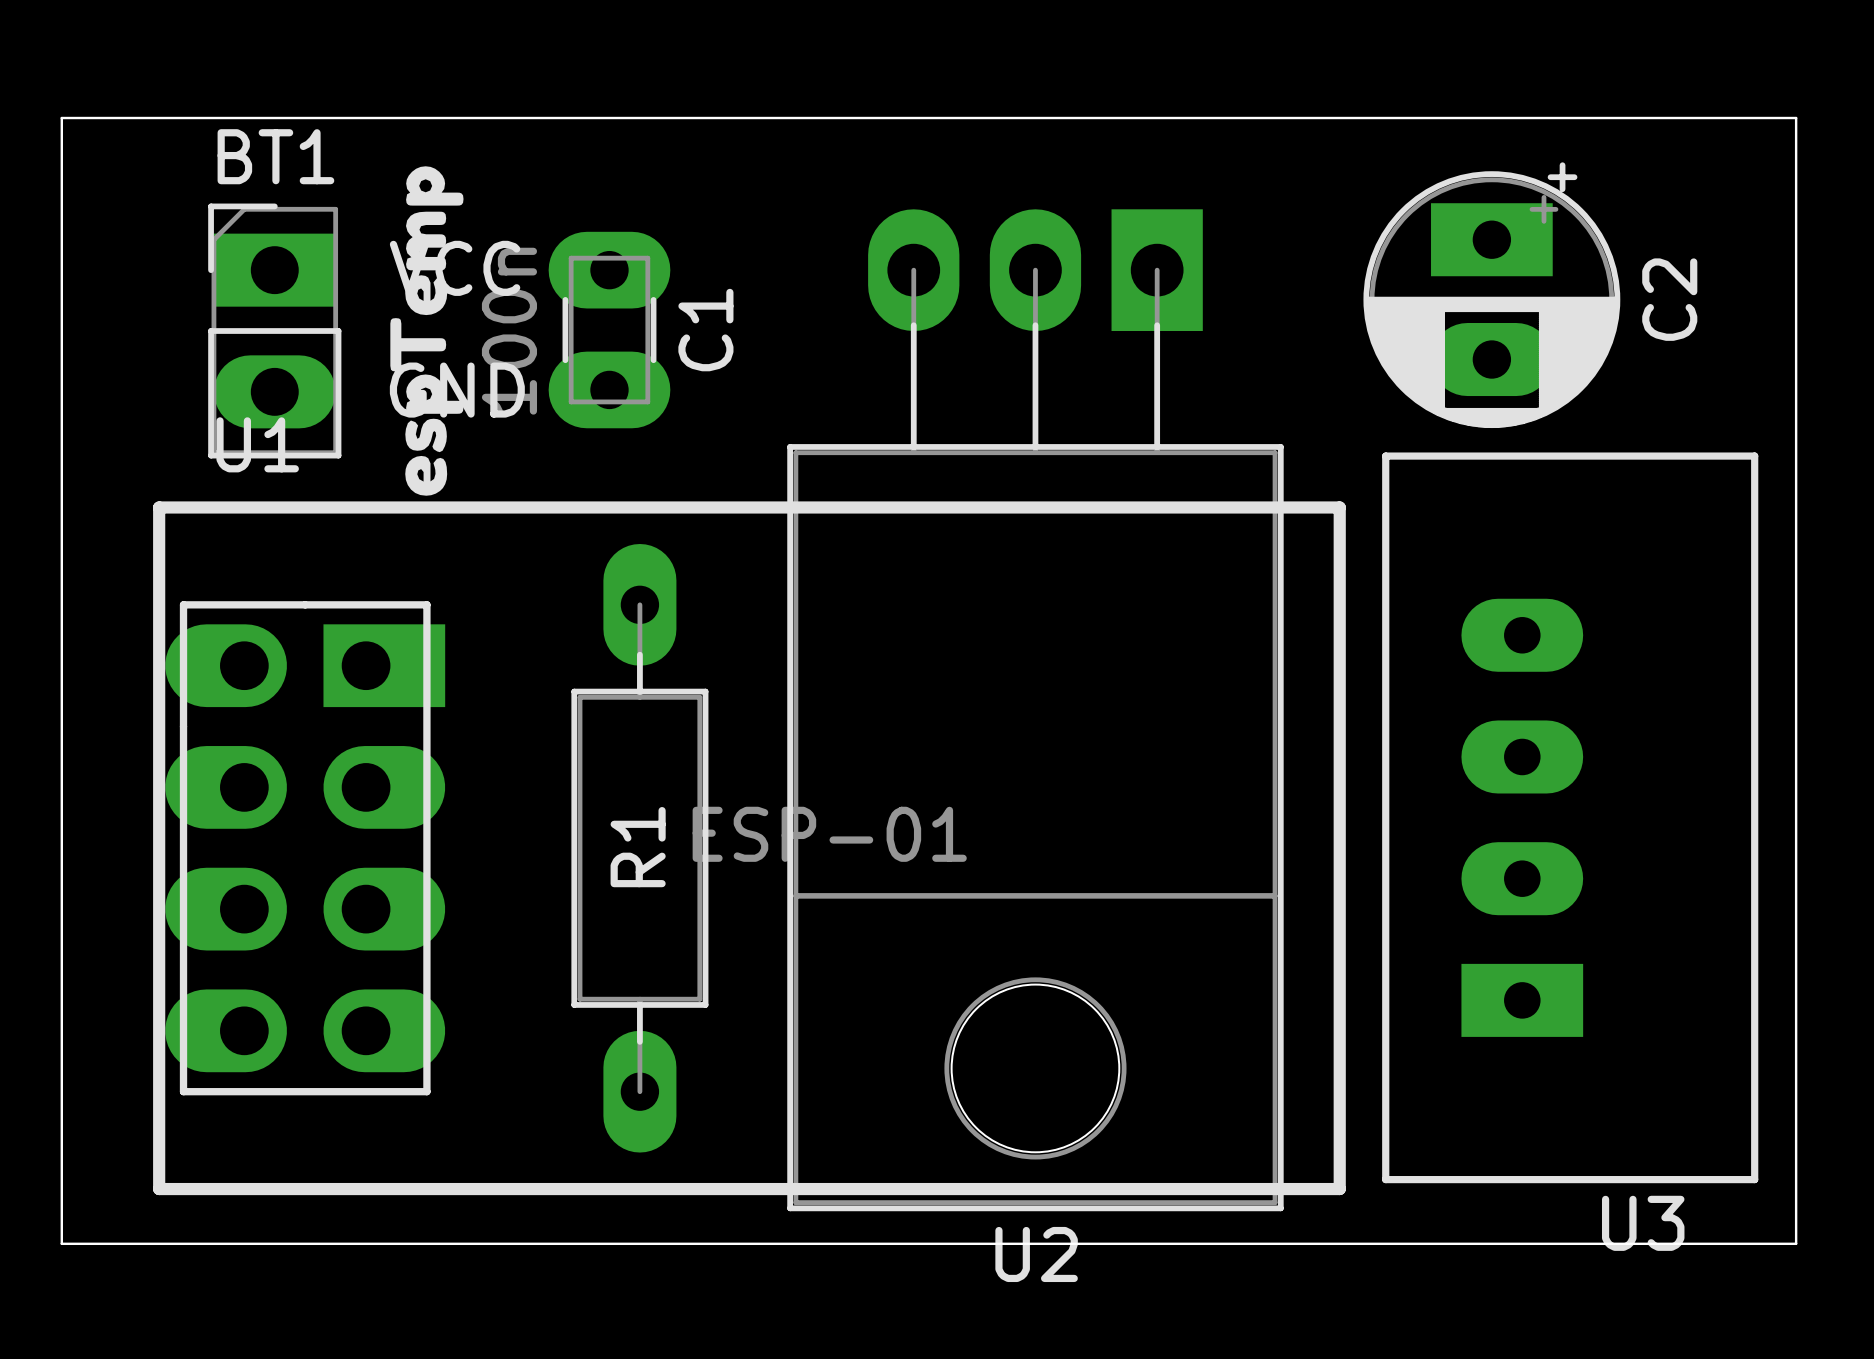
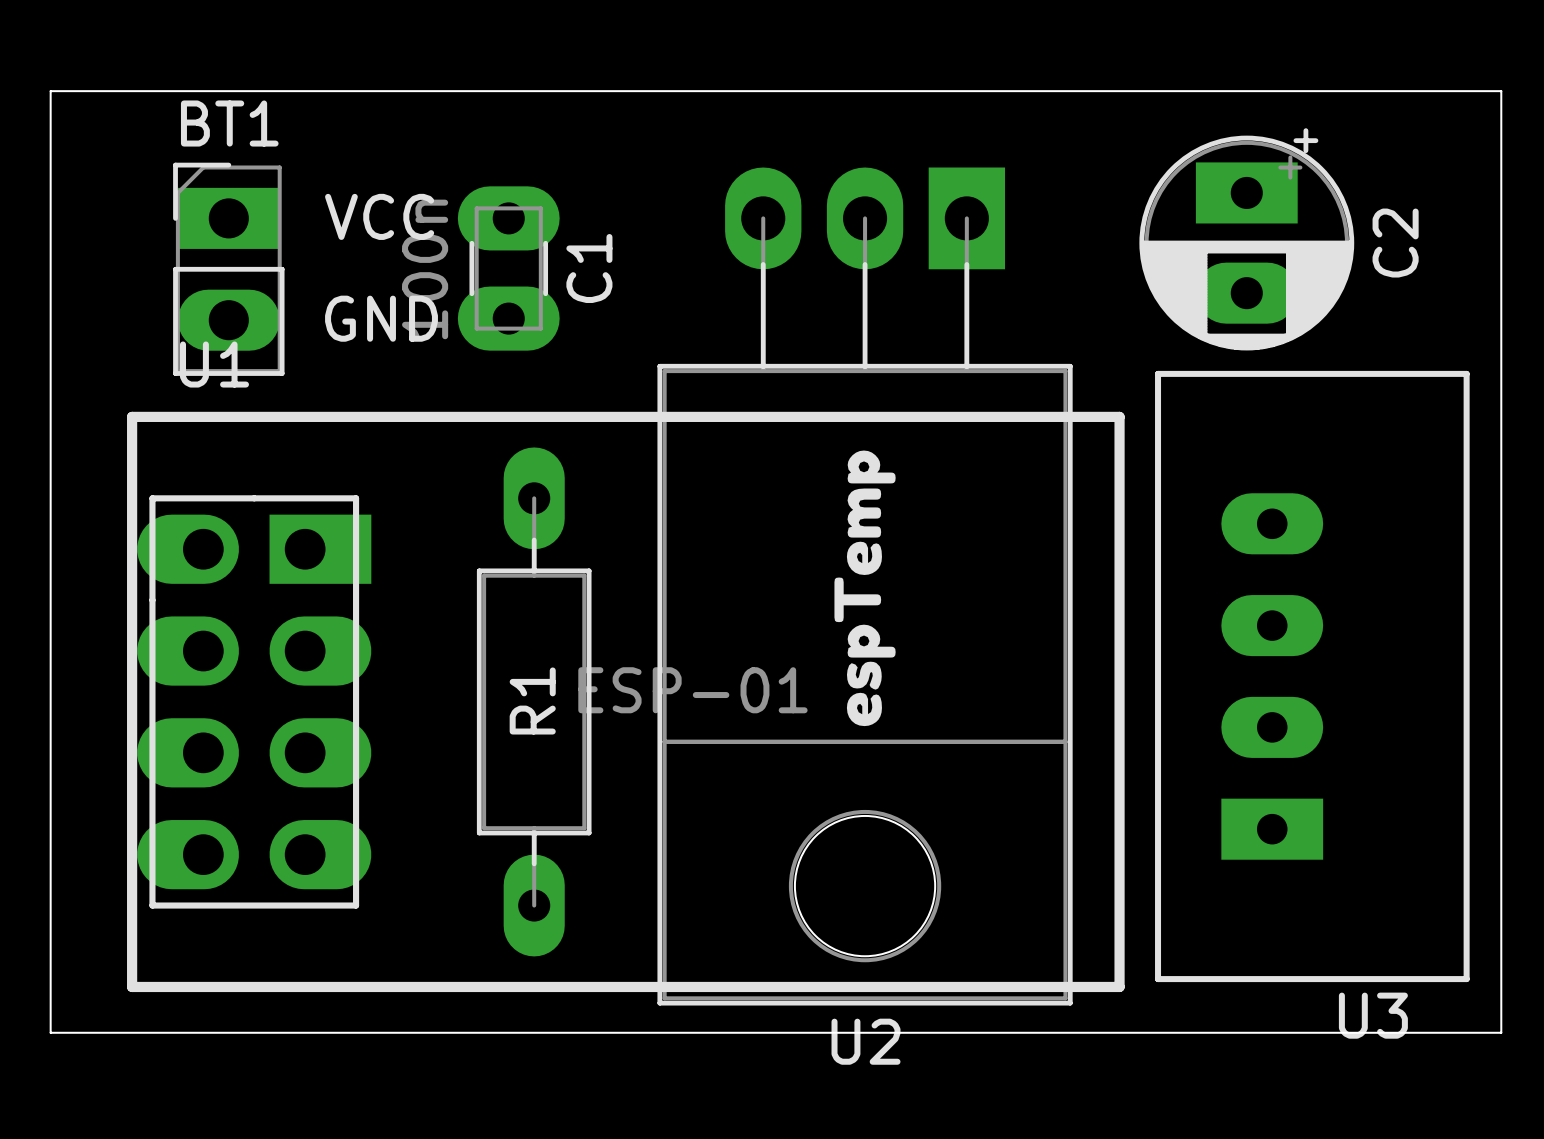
drawing position: (426, 331) -> (865, 588)

